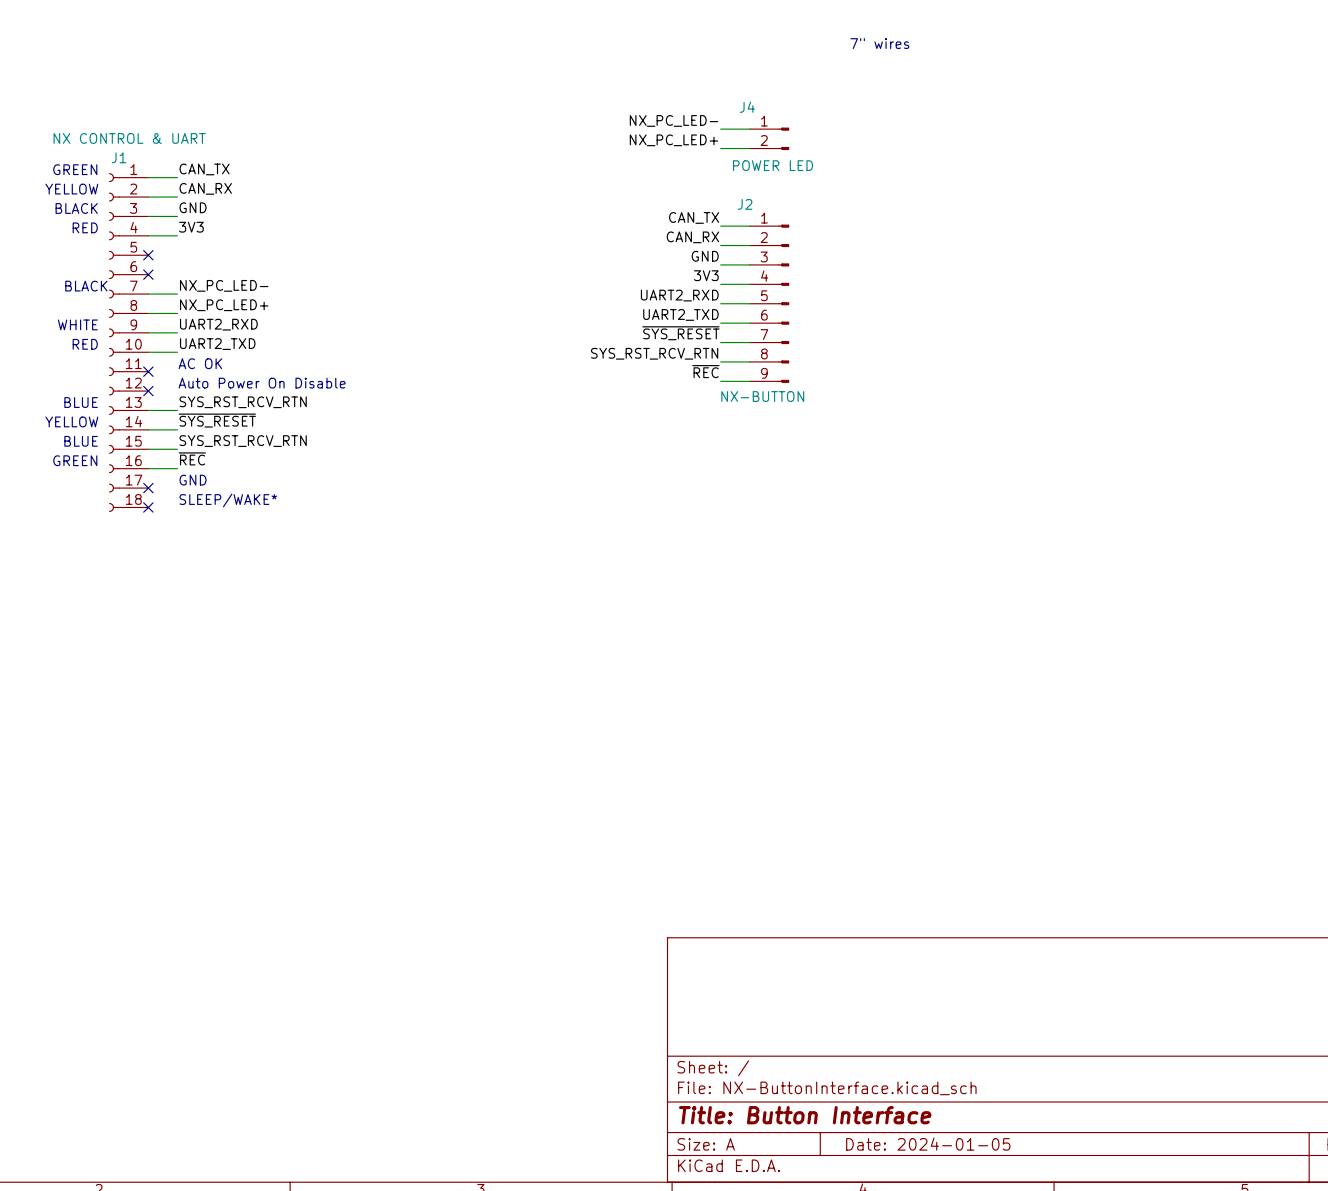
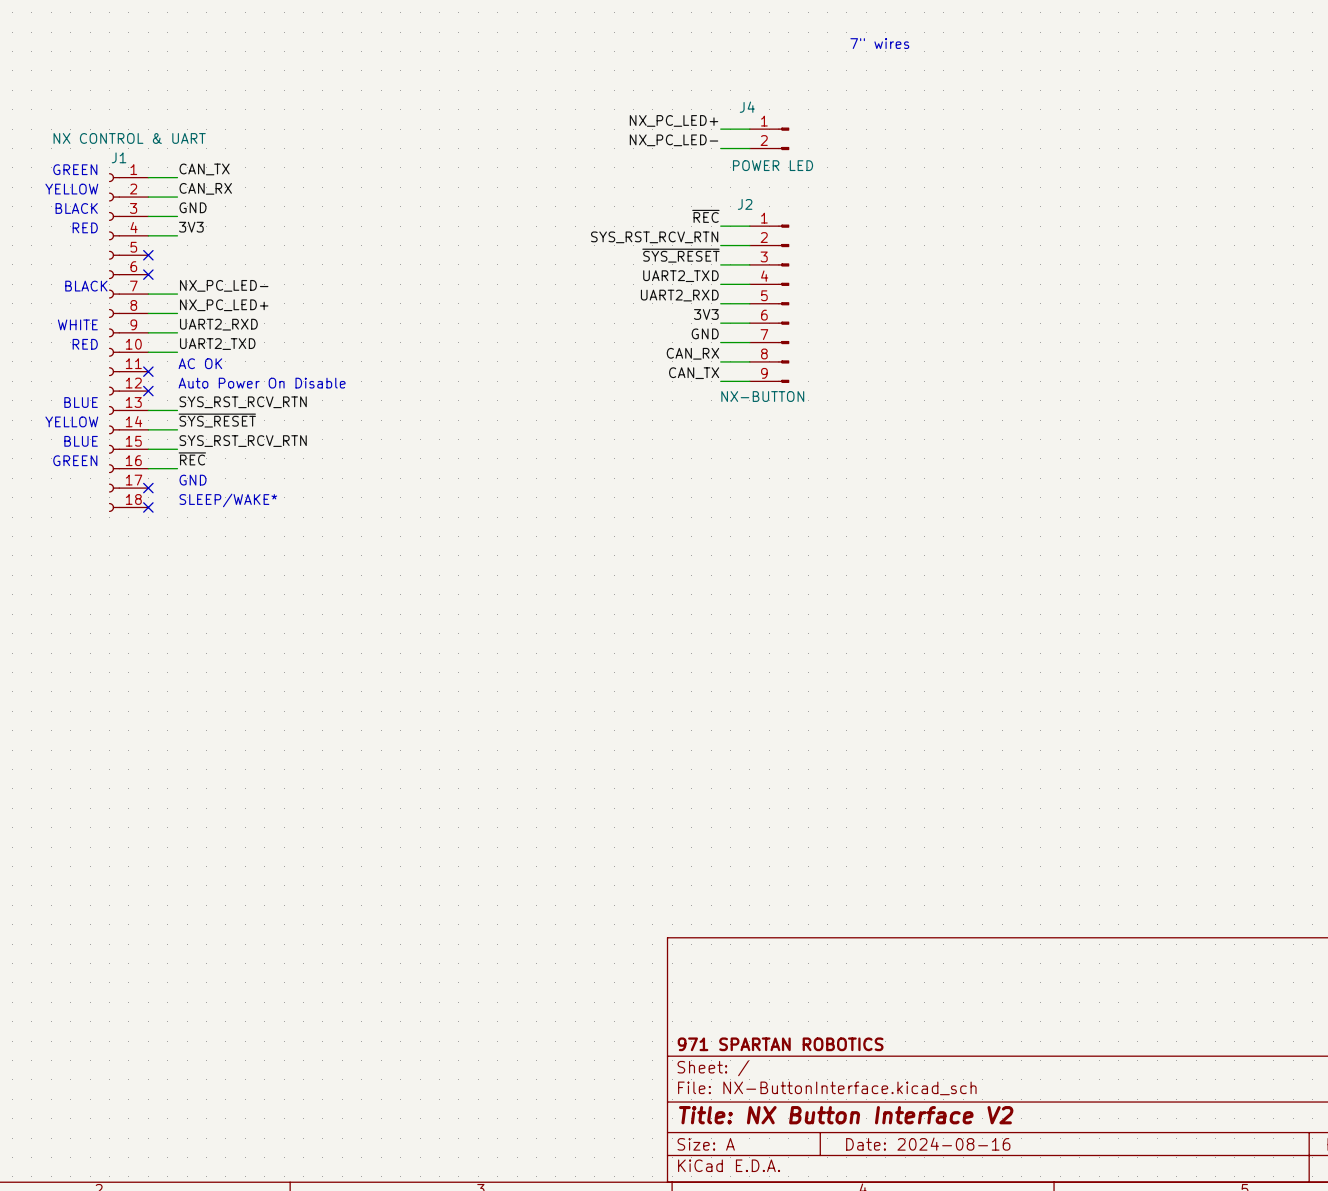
label: NX_PC_LED- (674, 120) -> NX_PC_LED+ (674, 120)
label: NX_PC_LED+ (674, 140) -> NX_PC_LED- (674, 140)
label: CAN_TX (694, 217) -> ~{REC} (705, 216)
label: CAN_RX (692, 237) -> SYS_RST_RCV_RTN (654, 237)
label: GND (705, 256) -> ~{SYS_RESET} (680, 255)
label: 3V3 (706, 275) -> UART2_TXD (680, 276)
label: UART2_TXD (680, 314) -> 3V3 (706, 314)
label: ~{SYS_RESET} (680, 333) -> GND (705, 333)
label: SYS_RST_RCV_RTN (654, 353) -> CAN_RX (692, 353)
label: ~{REC} (705, 371) -> CAN_TX (694, 373)
title block: none -> 971 SPARTAN ROBOTICS (780, 1044)
title block: Title: Button Interface (805, 1115) -> Title: NX Button Interface V2 (846, 1115)
title block: Date: 2024-01-05 (928, 1144) -> Date: 2024-08-16 (928, 1144)

